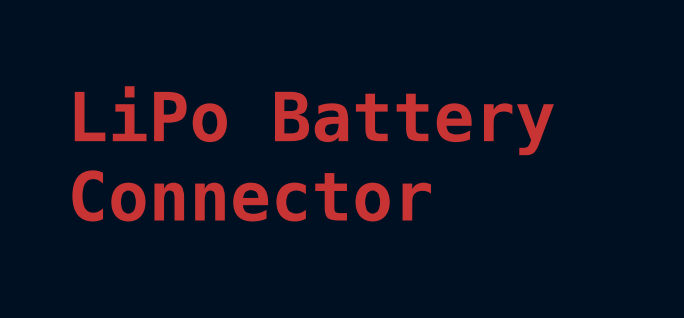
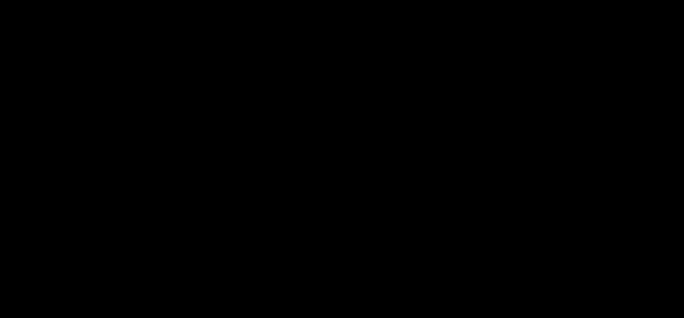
text: LiPo Battery (314, 120) -> none
text: Connector (251, 195) -> none

